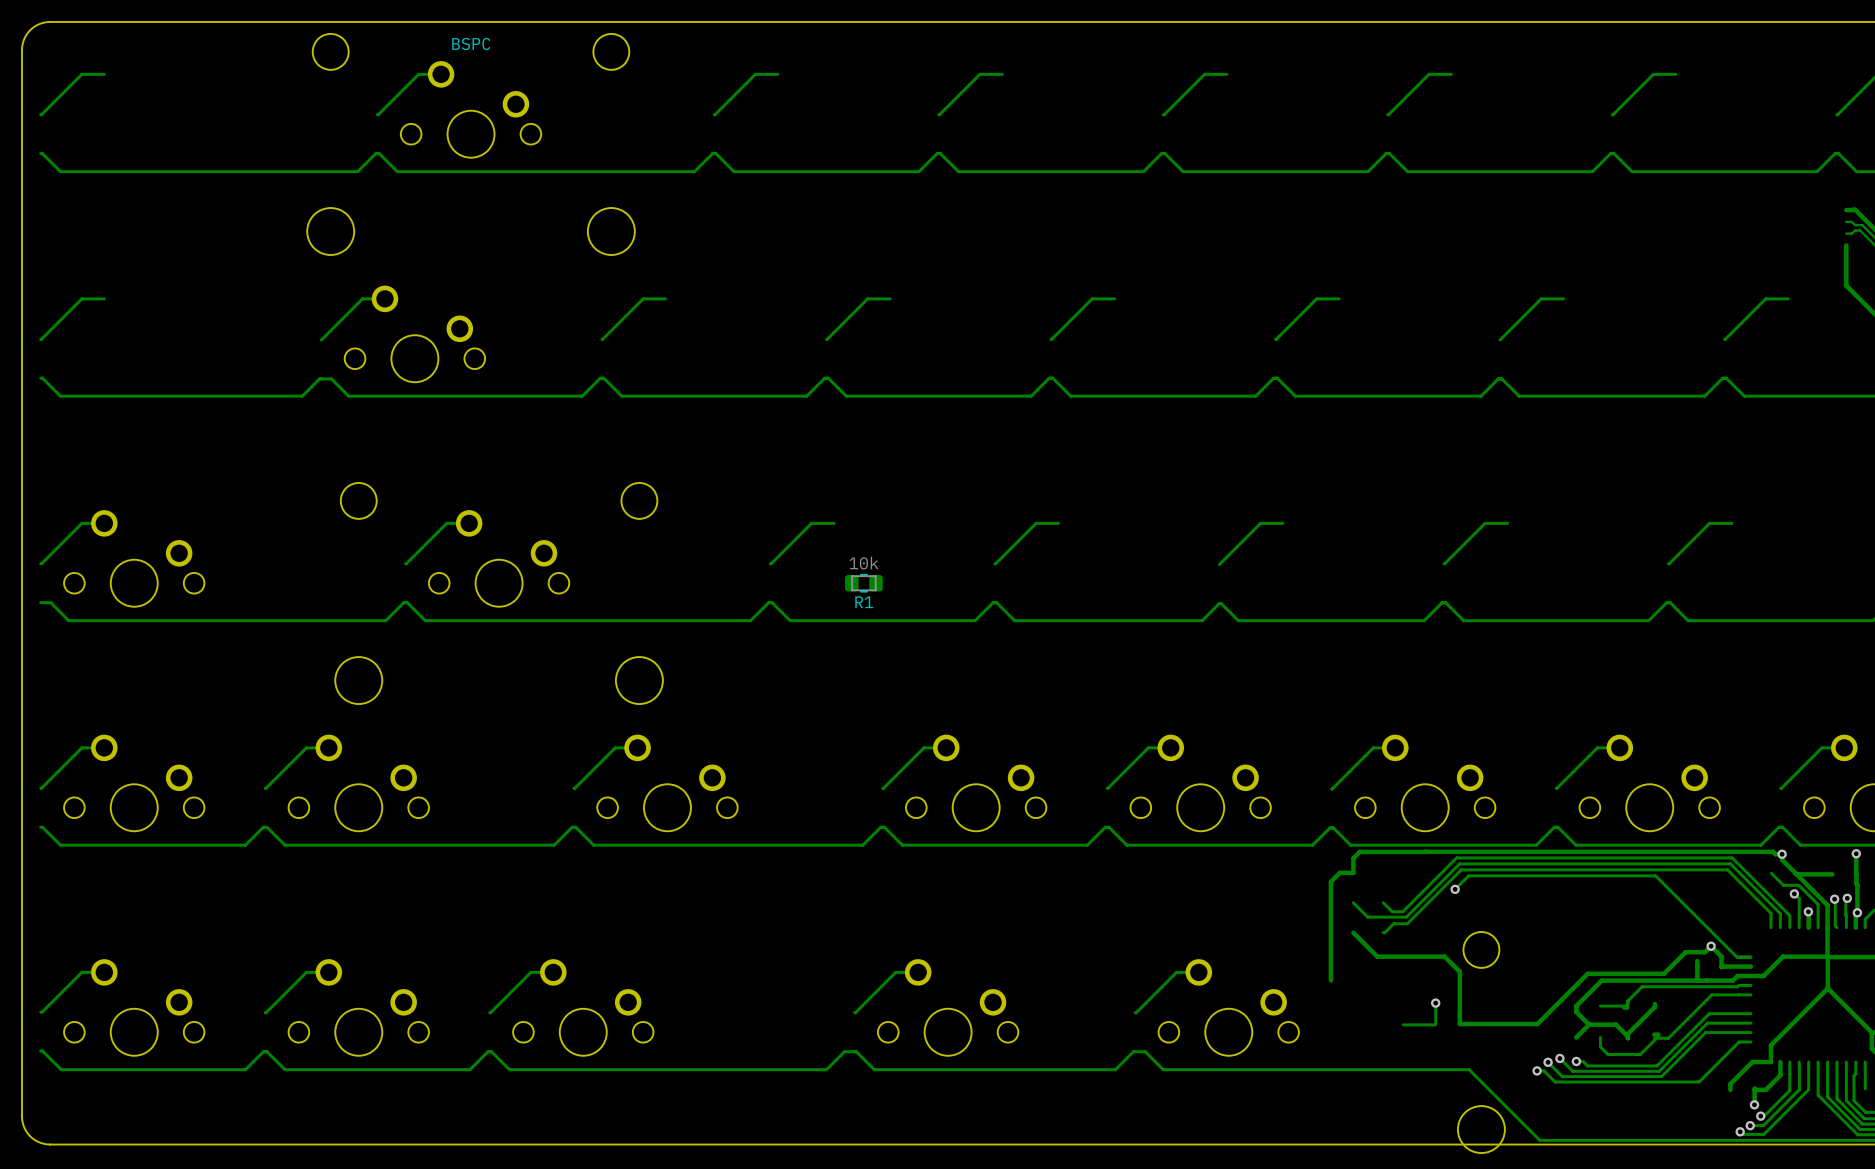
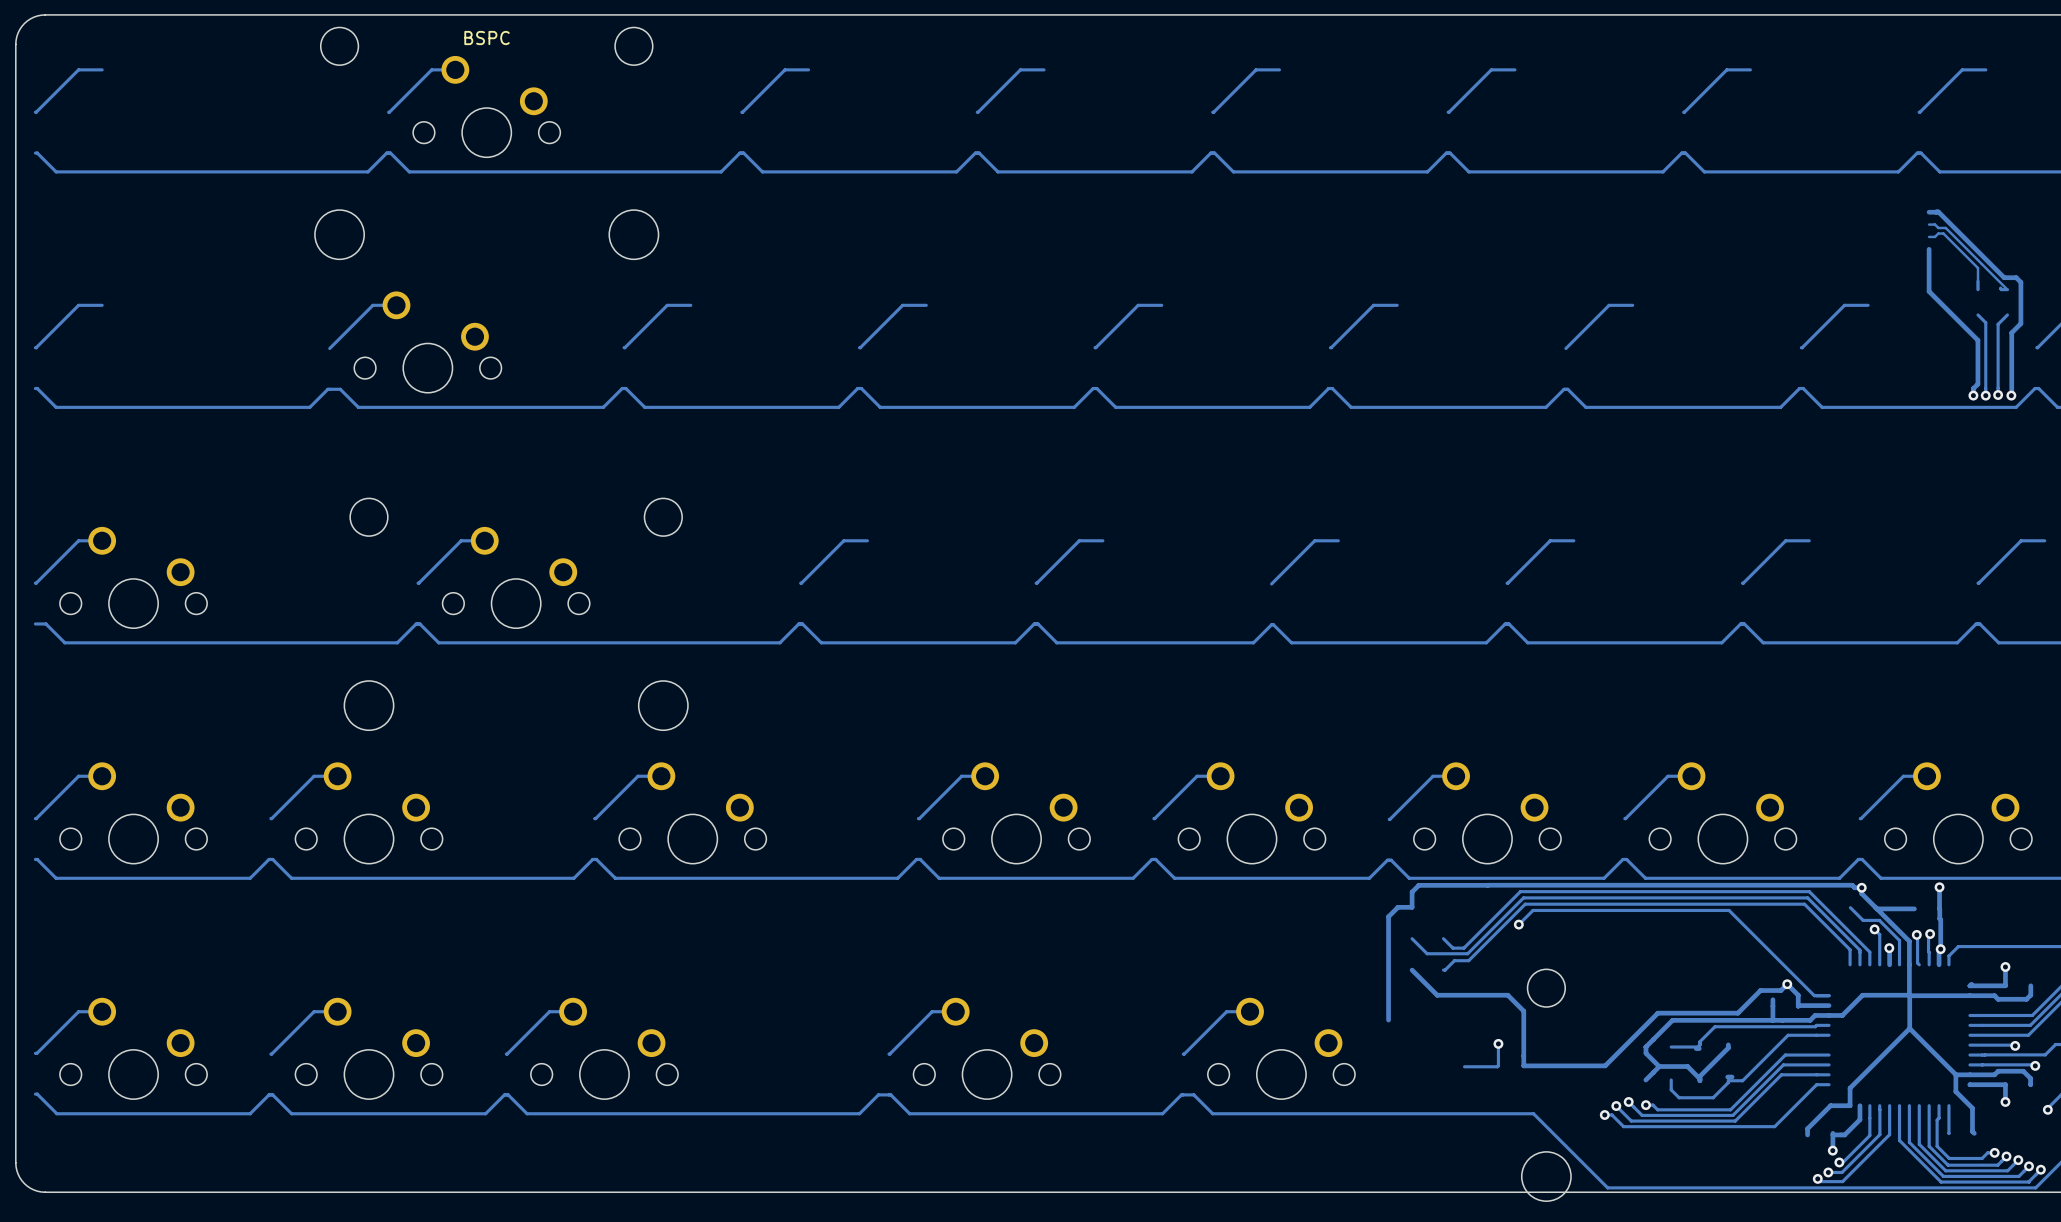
R1: 10k (863, 583) -> none

